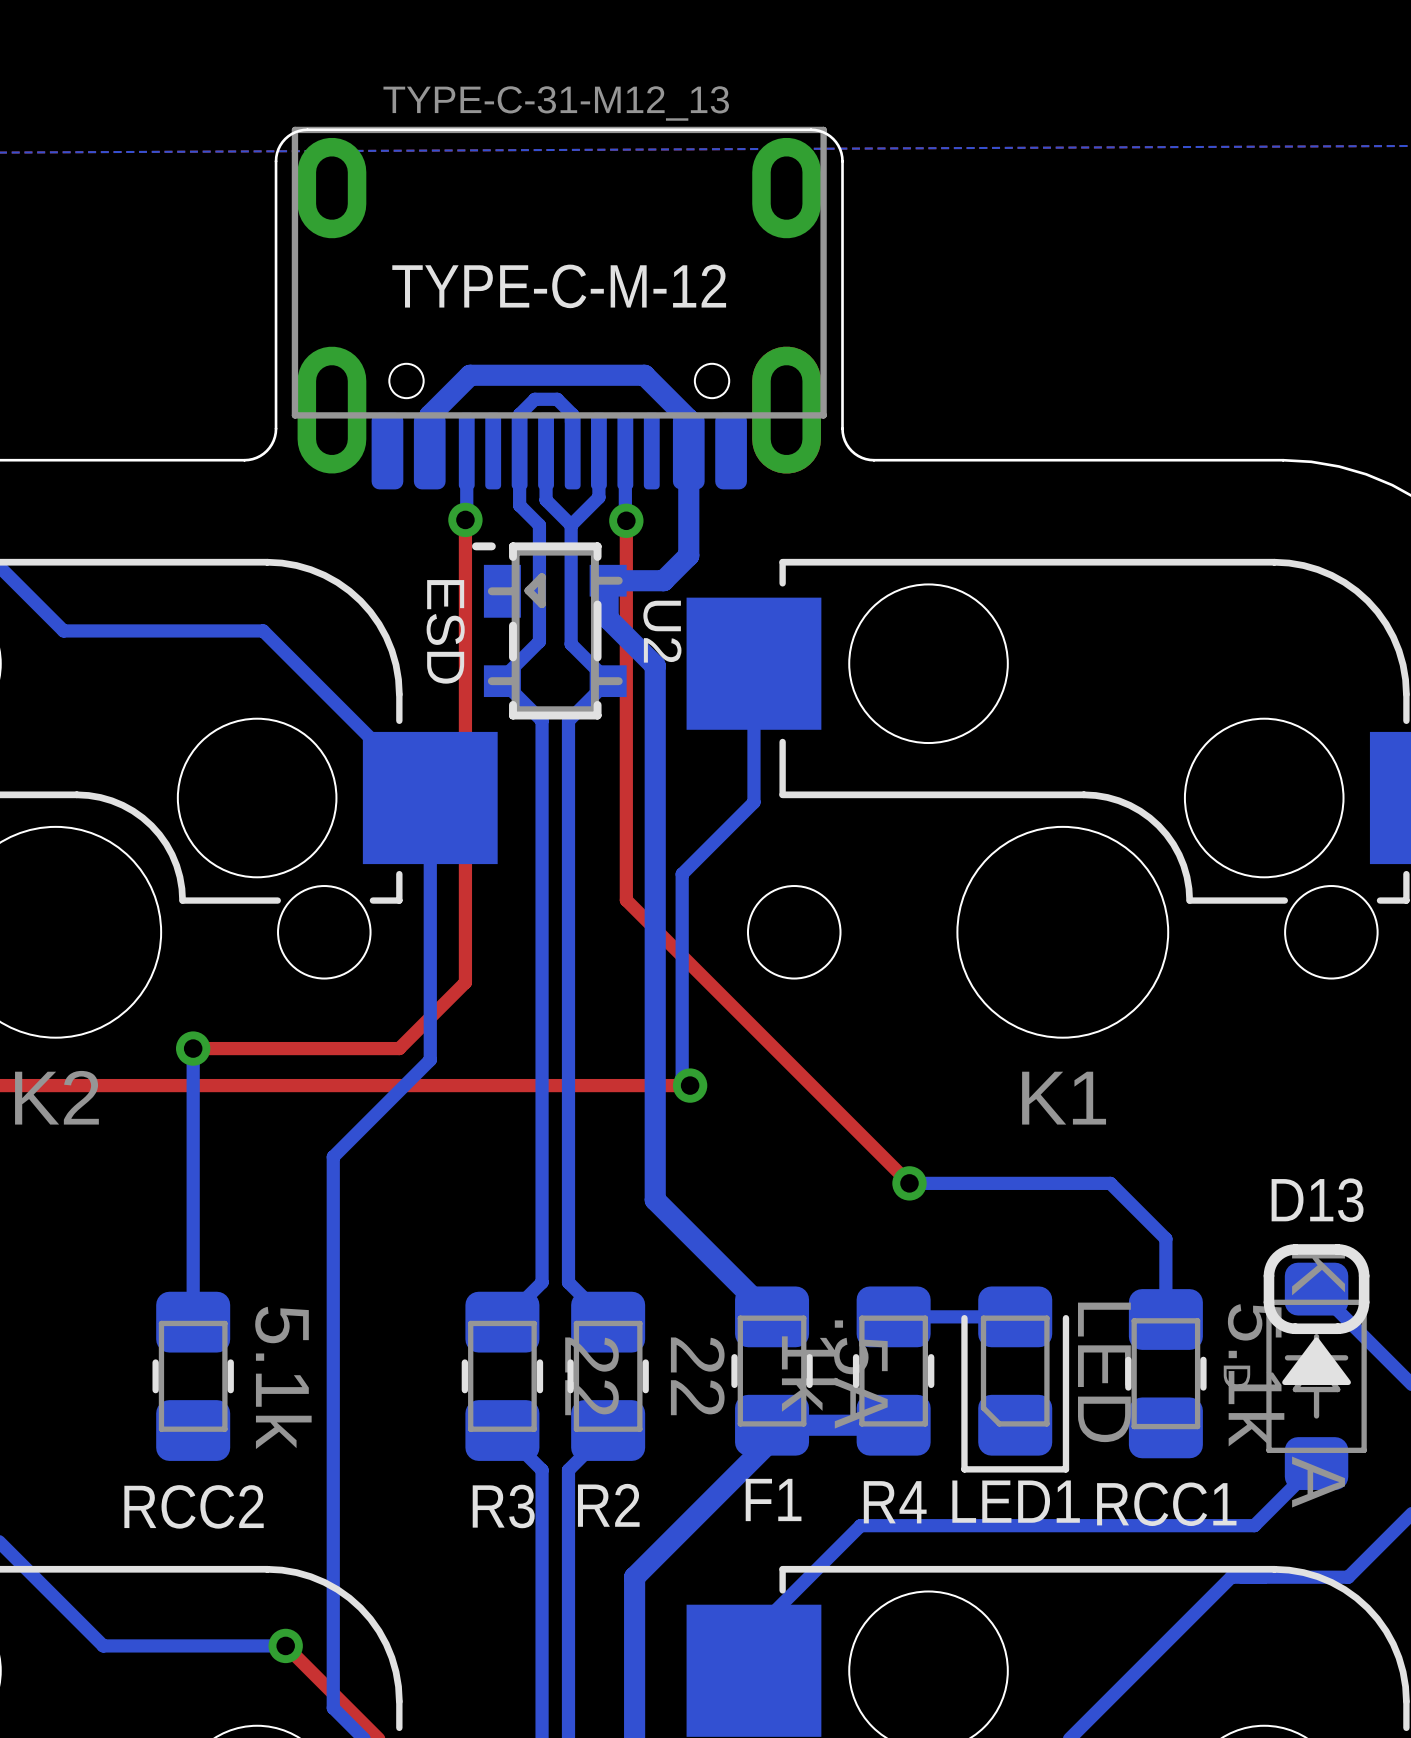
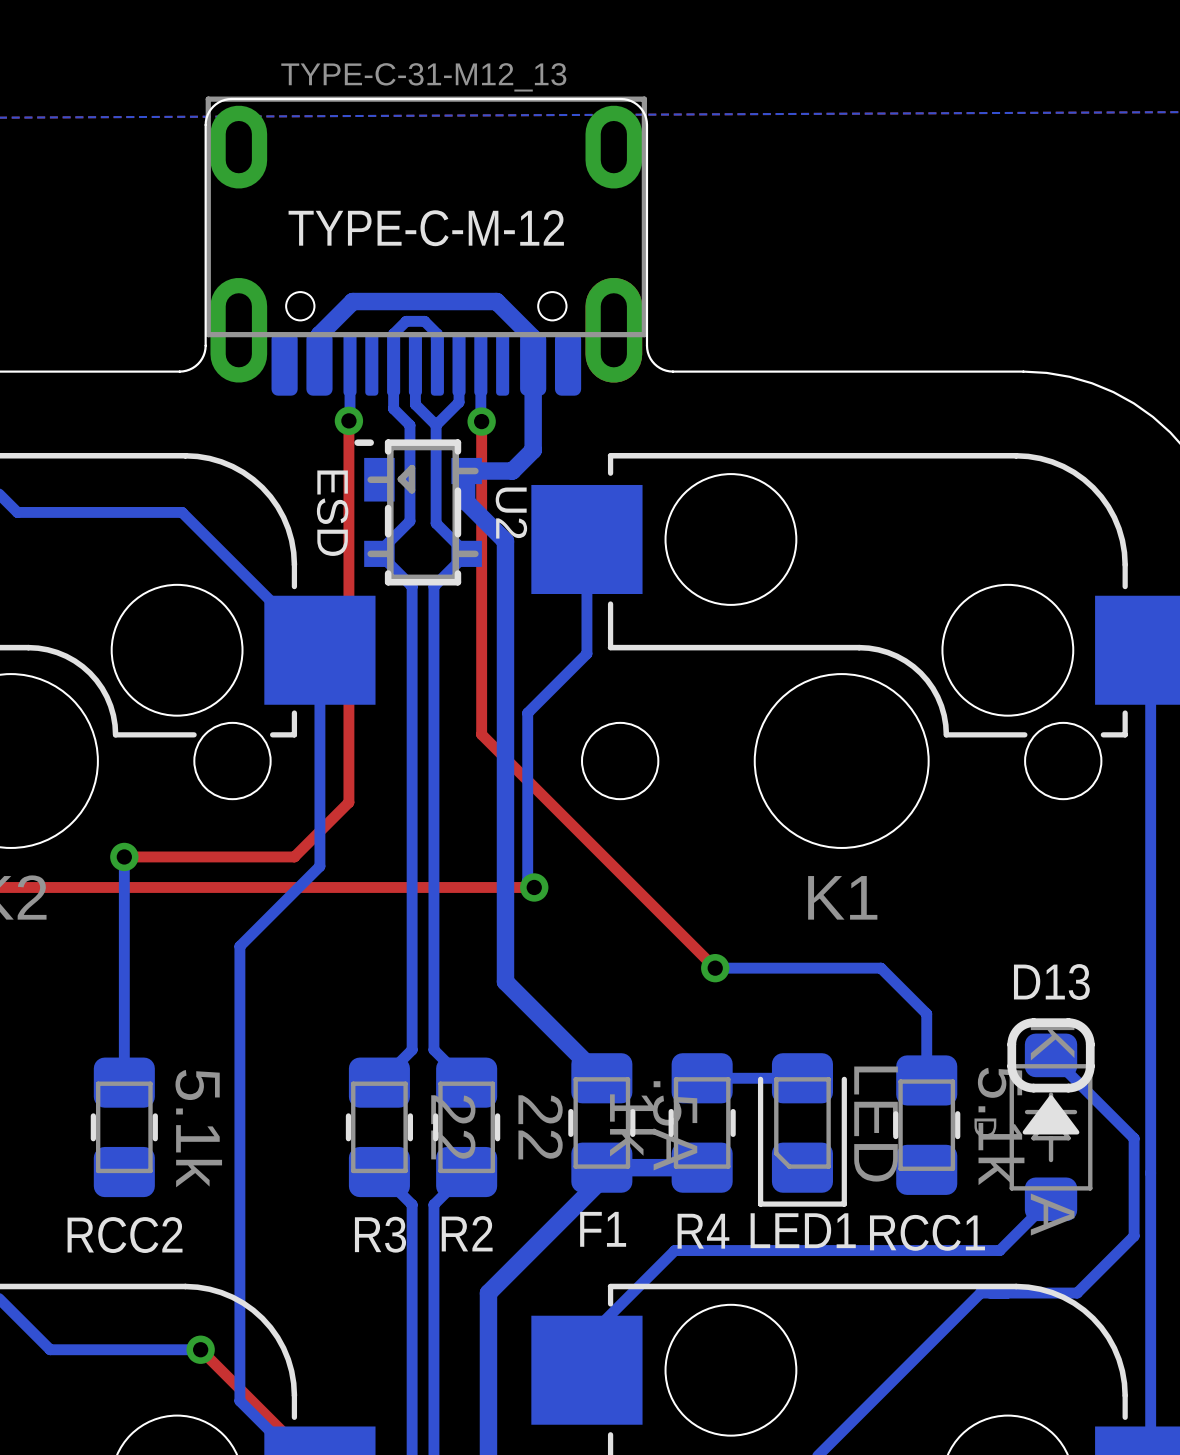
board edge: (323, 129) (303, 130) (291, 133) (282, 142) (277, 153) (275, 432) (271, 444) (266, 450) (256, 457) (244, 460) -> (231, 99) (215, 104) (209, 111) (205, 121) (204, 352) (200, 361) (192, 368) (183, 371) (166, 371)
board edge: (795, 129) (815, 130) (826, 133) (836, 142) (841, 153) (842, 432) (846, 444) (854, 453) (865, 459) (873, 460) -> (621, 99) (636, 104) (643, 111) (646, 121) (647, 352) (652, 361) (659, 368) (669, 371) (685, 371)

